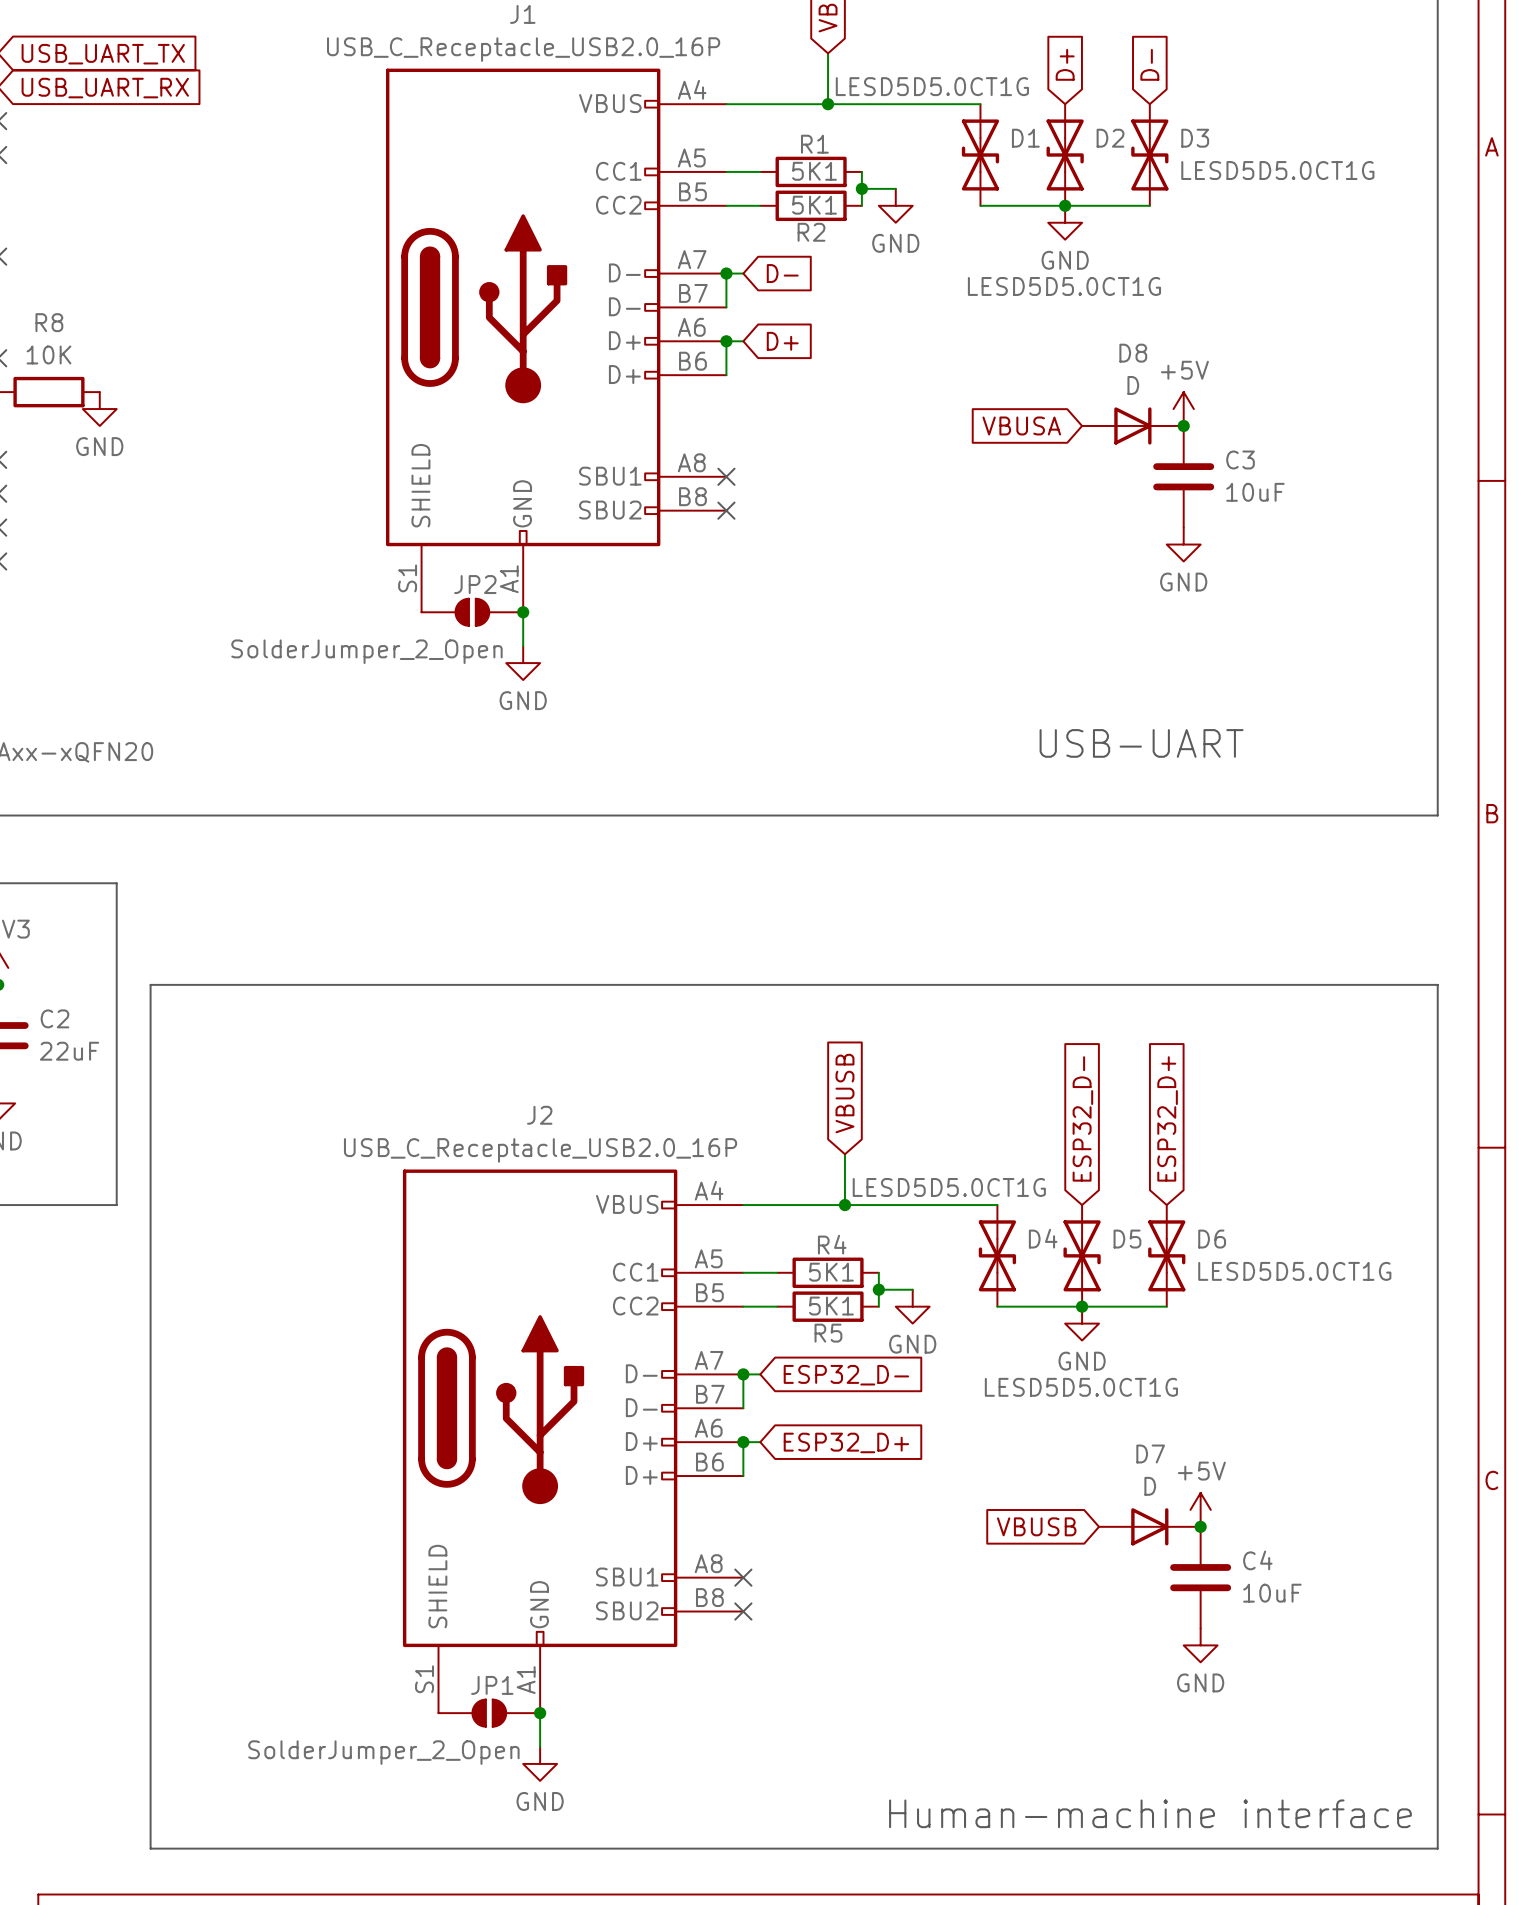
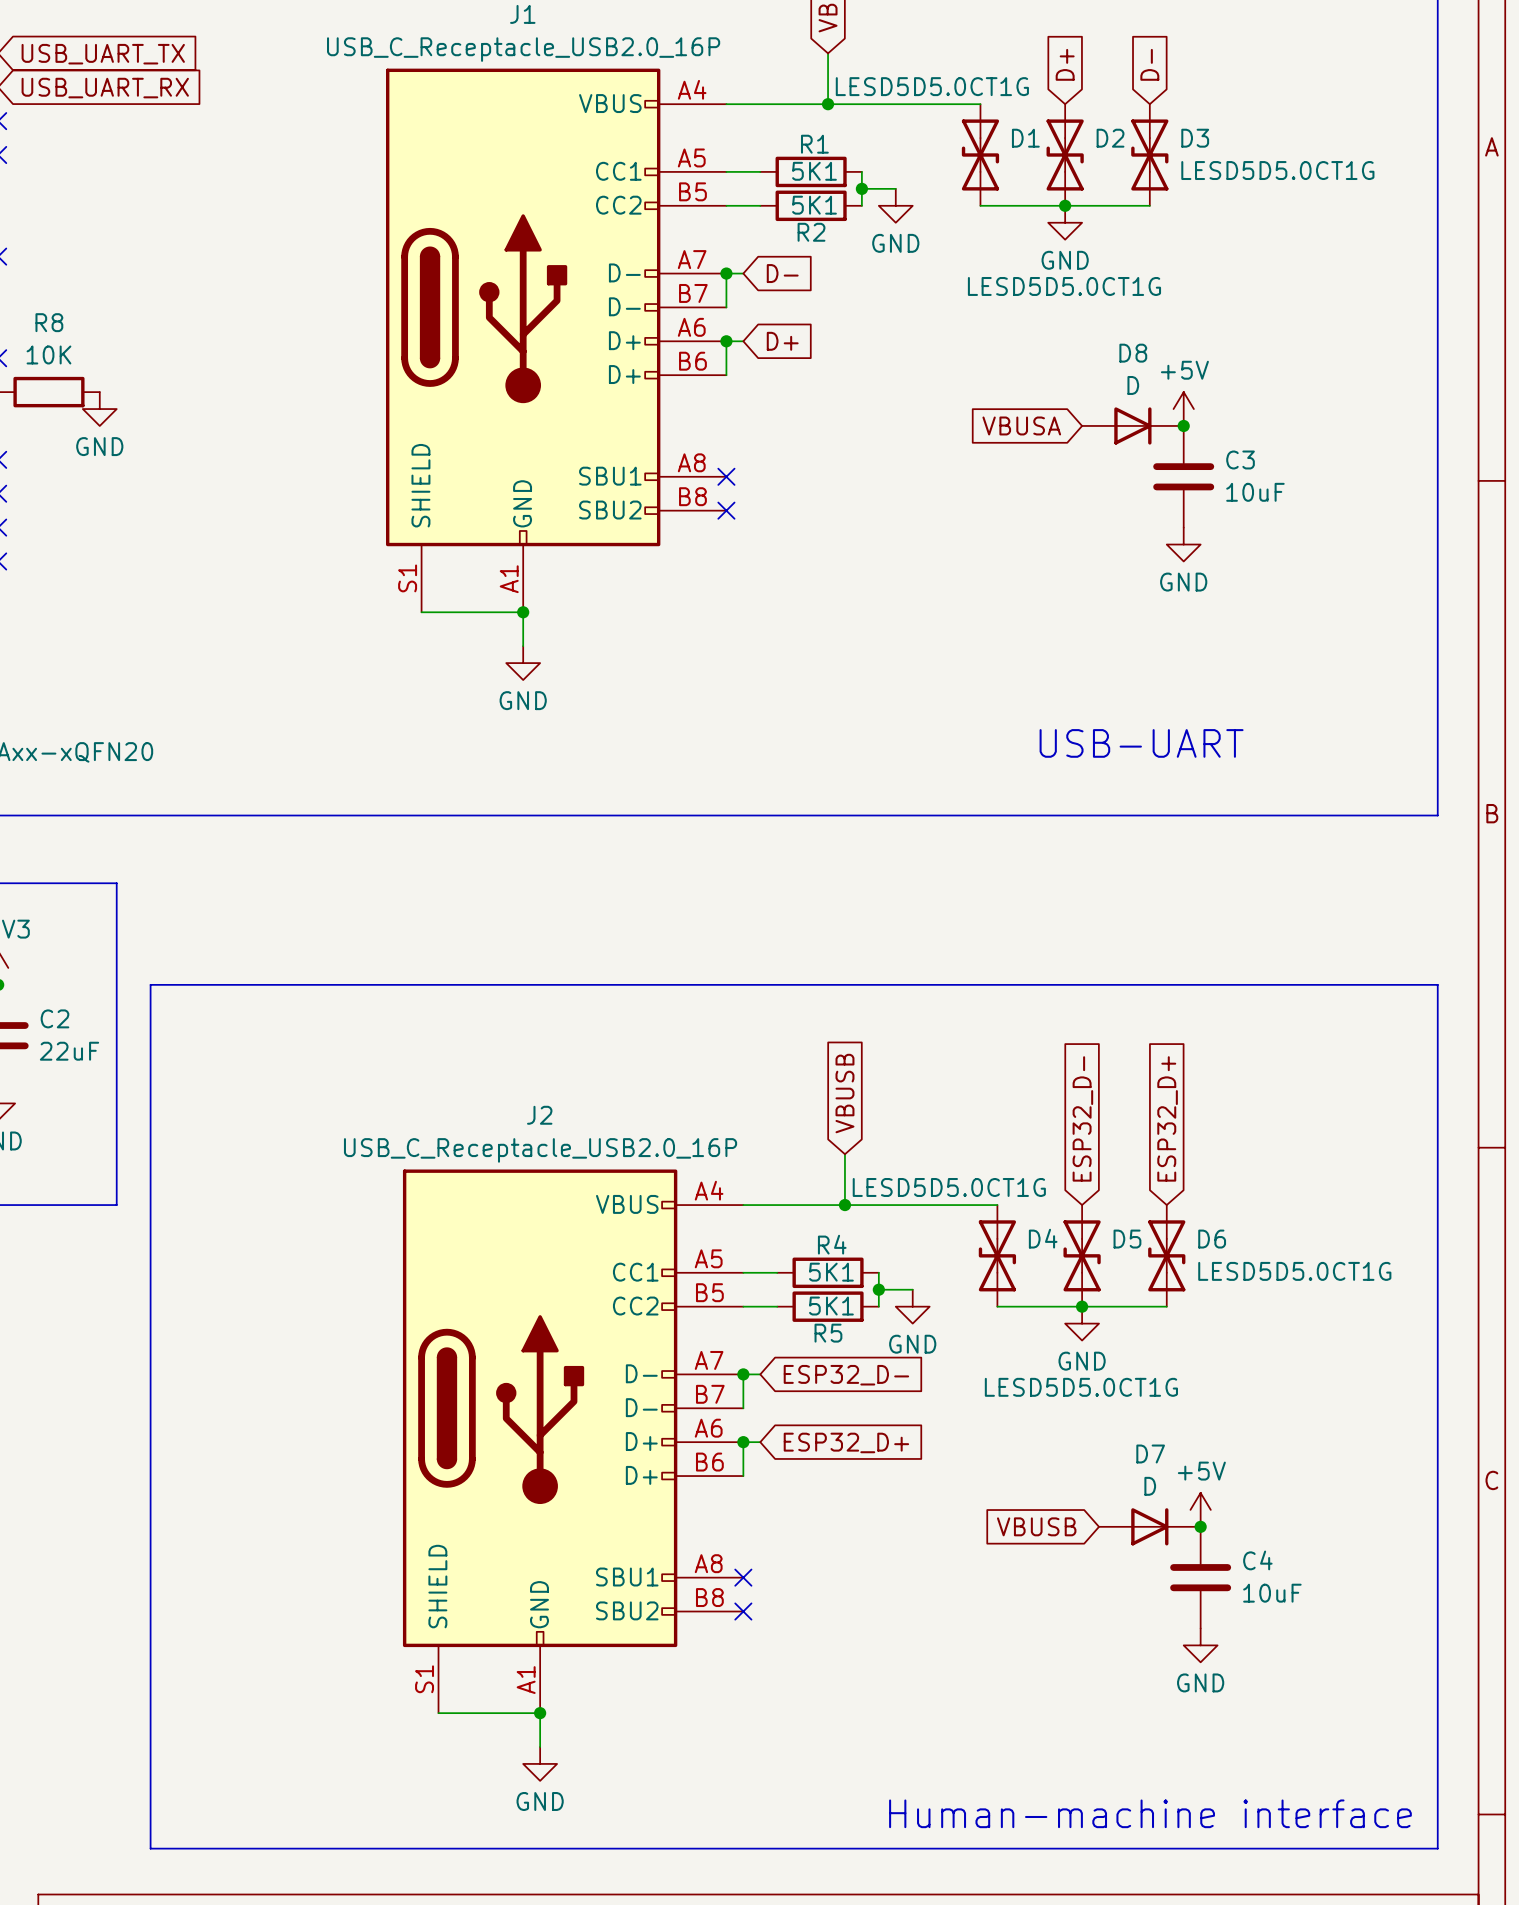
JP2: SolderJumper_2_Open (472, 612) -> none
JP1: SolderJumper_2_Open (489, 1713) -> none

